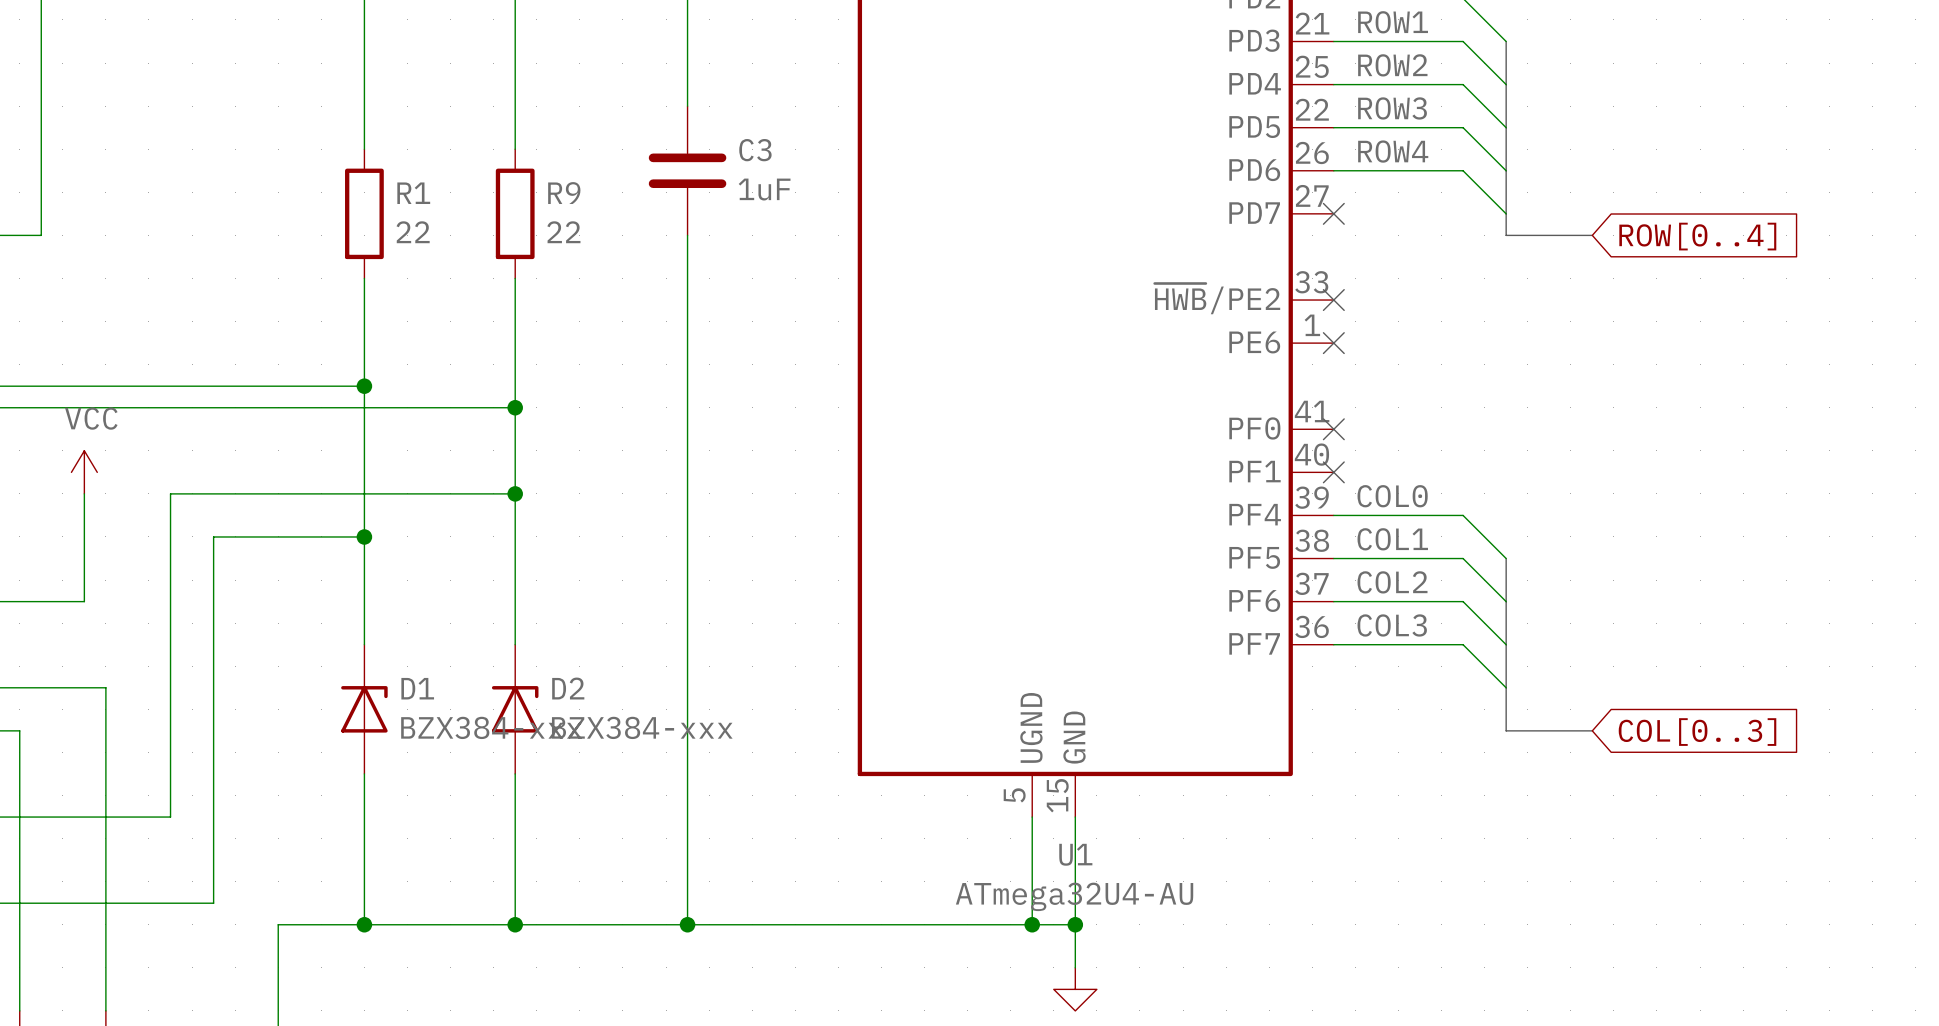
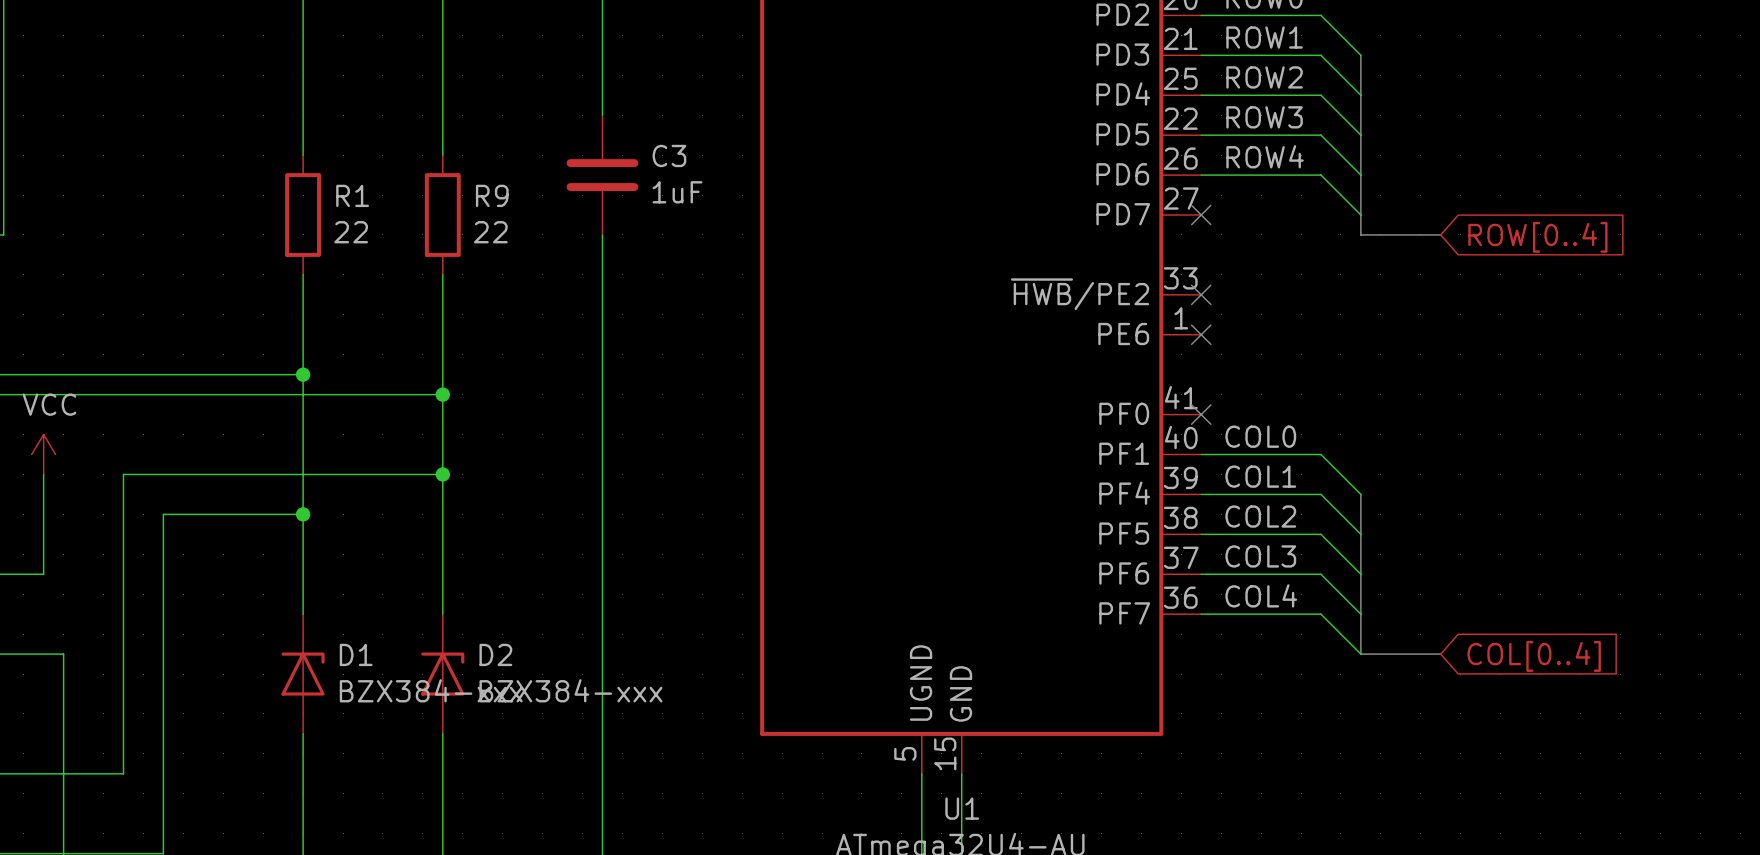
label: none -> COL0 (1260, 436)
wire: none -> (1201, 454) (1320, 454) (1360, 494)
no-connect mark: (1333, 472) -> none
label: COL0 (1392, 496) -> COL1 (1260, 476)
bus: none -> (1360, 494) (1360, 534)
label: COL1 (1392, 539) -> COL2 (1260, 516)
label: COL2 (1392, 582) -> COL3 (1260, 556)
label: COL3 (1392, 625) -> COL4 (1261, 595)
bus: (1506, 687) (1506, 730) (1592, 730) -> (1360, 654) (1440, 654)
global label: COL[0..3] (1697, 732) -> COL[0..4] (1534, 656)

